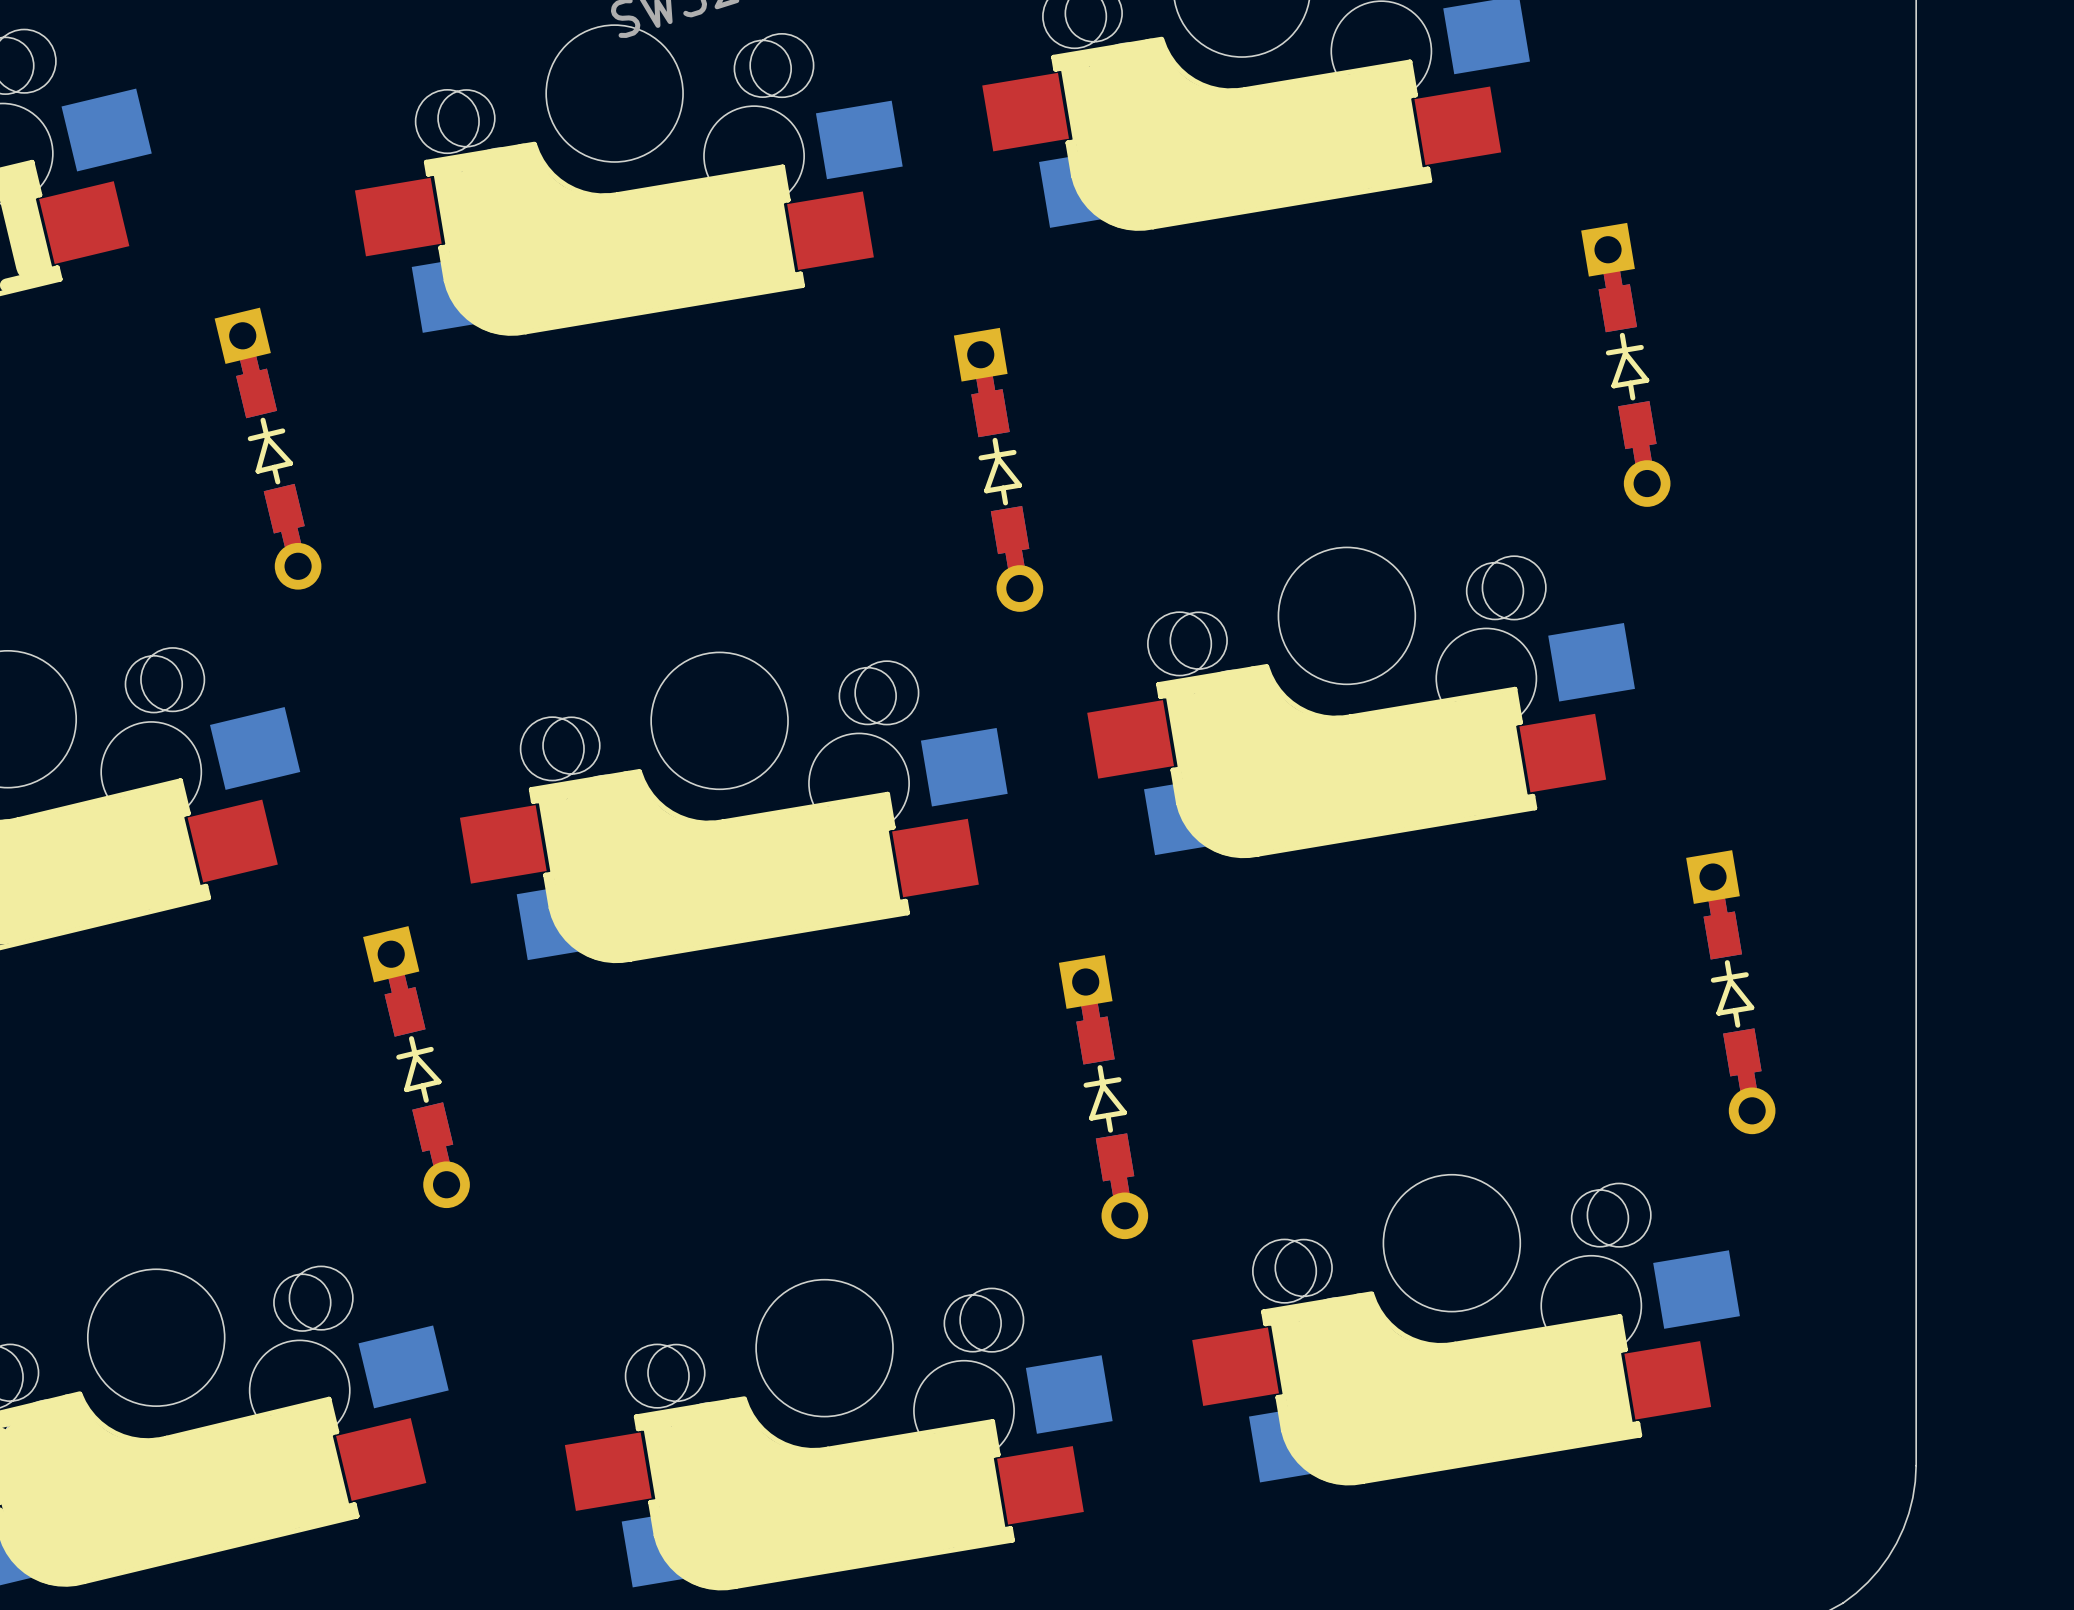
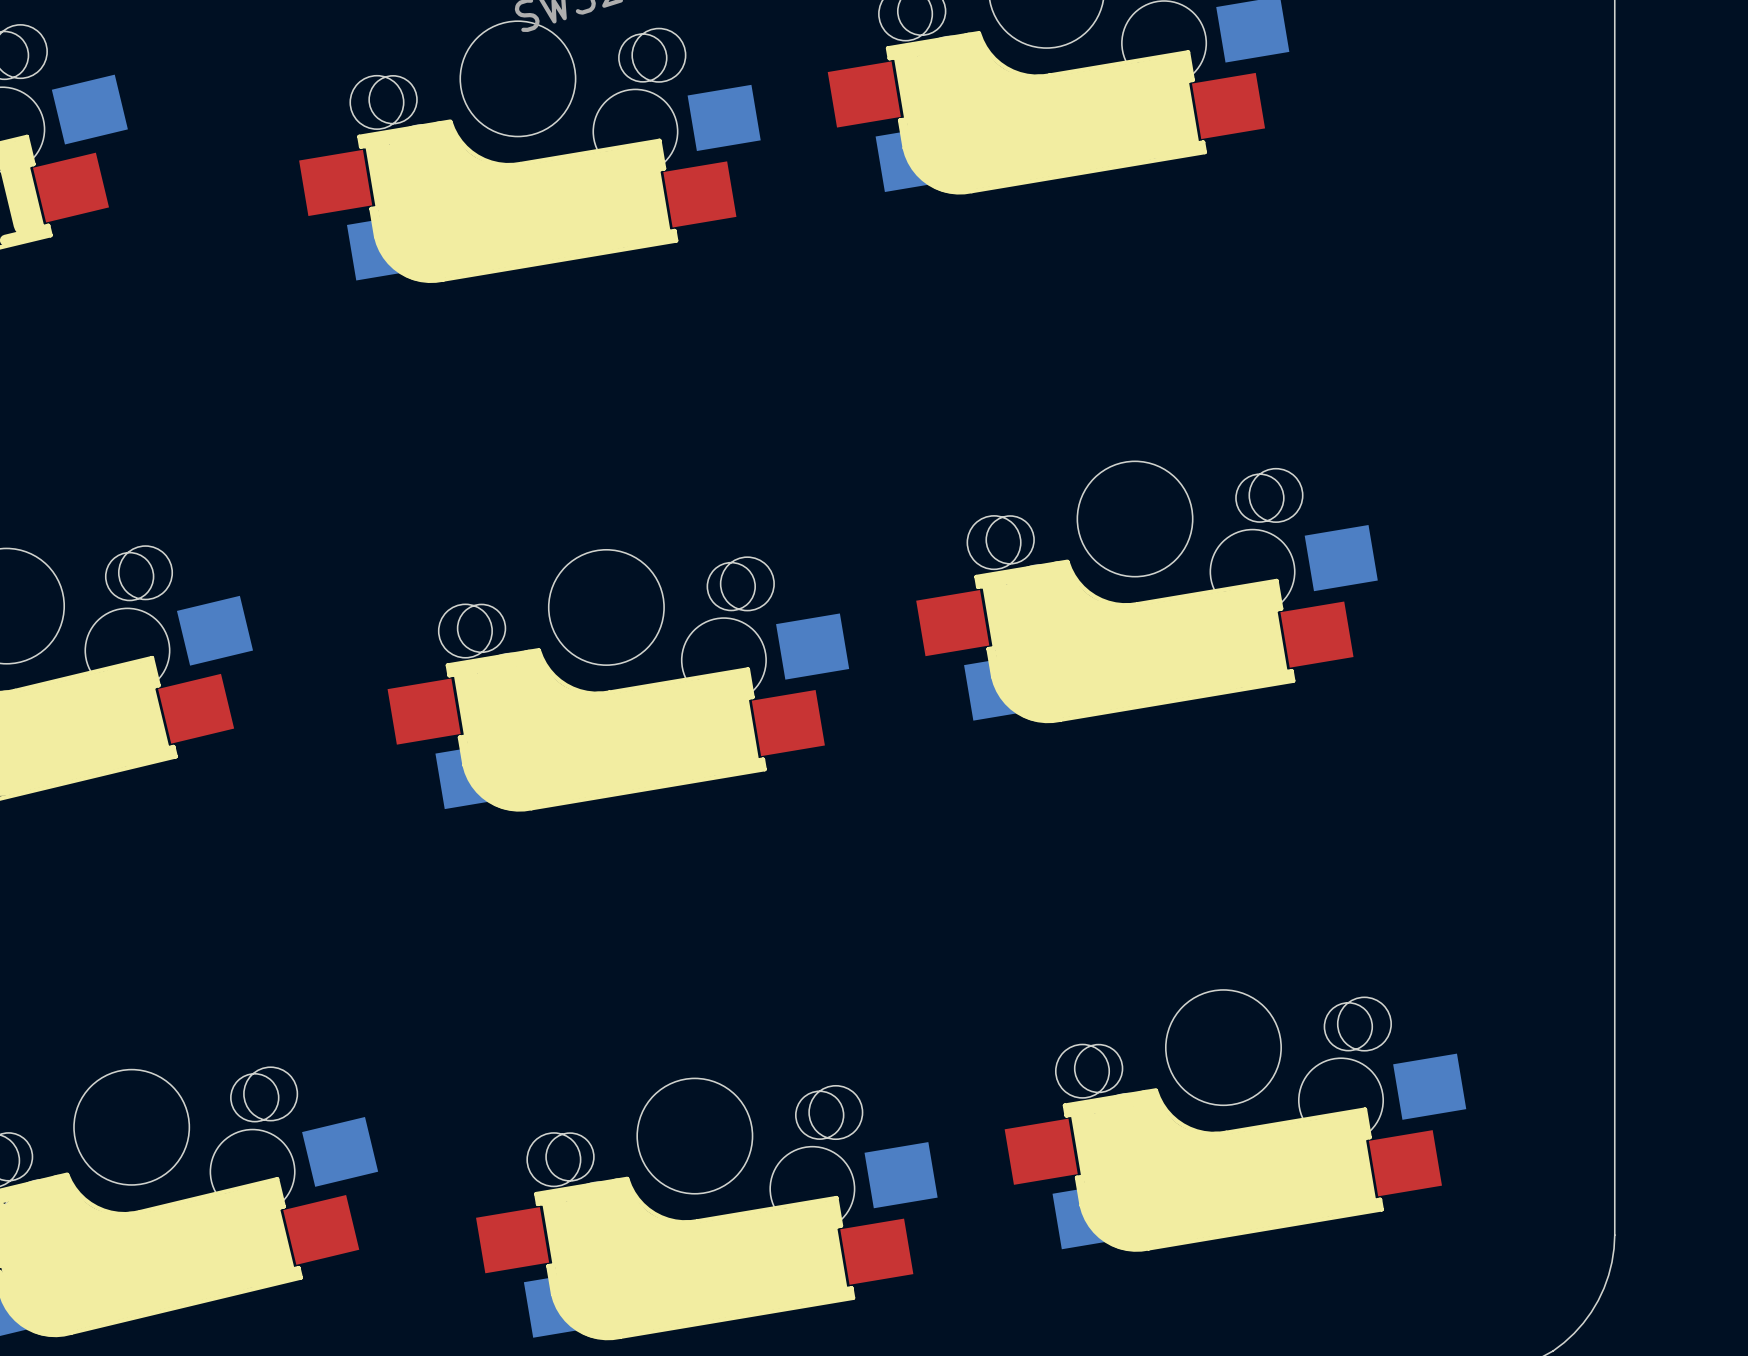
part: (1625, 364) -> none
part: (268, 448) -> none
part: (998, 469) -> none
part: (1730, 992) -> none
part: (416, 1067) -> none
part: (1103, 1097) -> none

